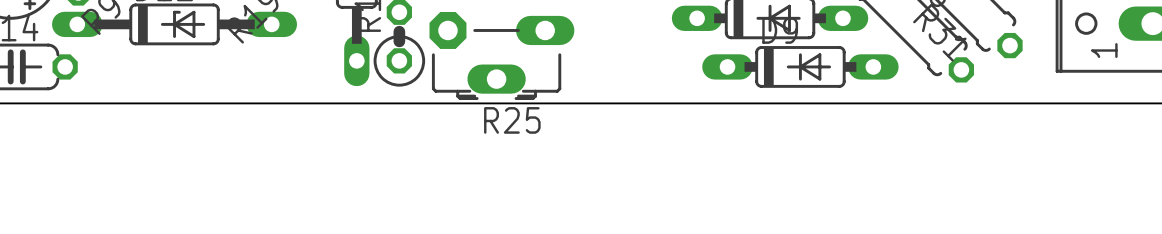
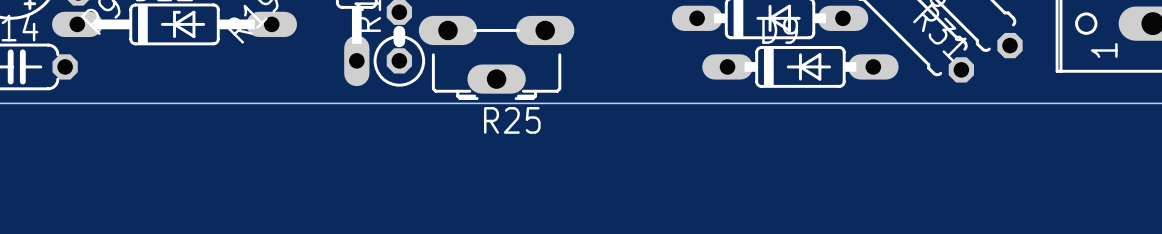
R25 footprint: [429, 12, 575, 101] -> [418, 15, 575, 101]

